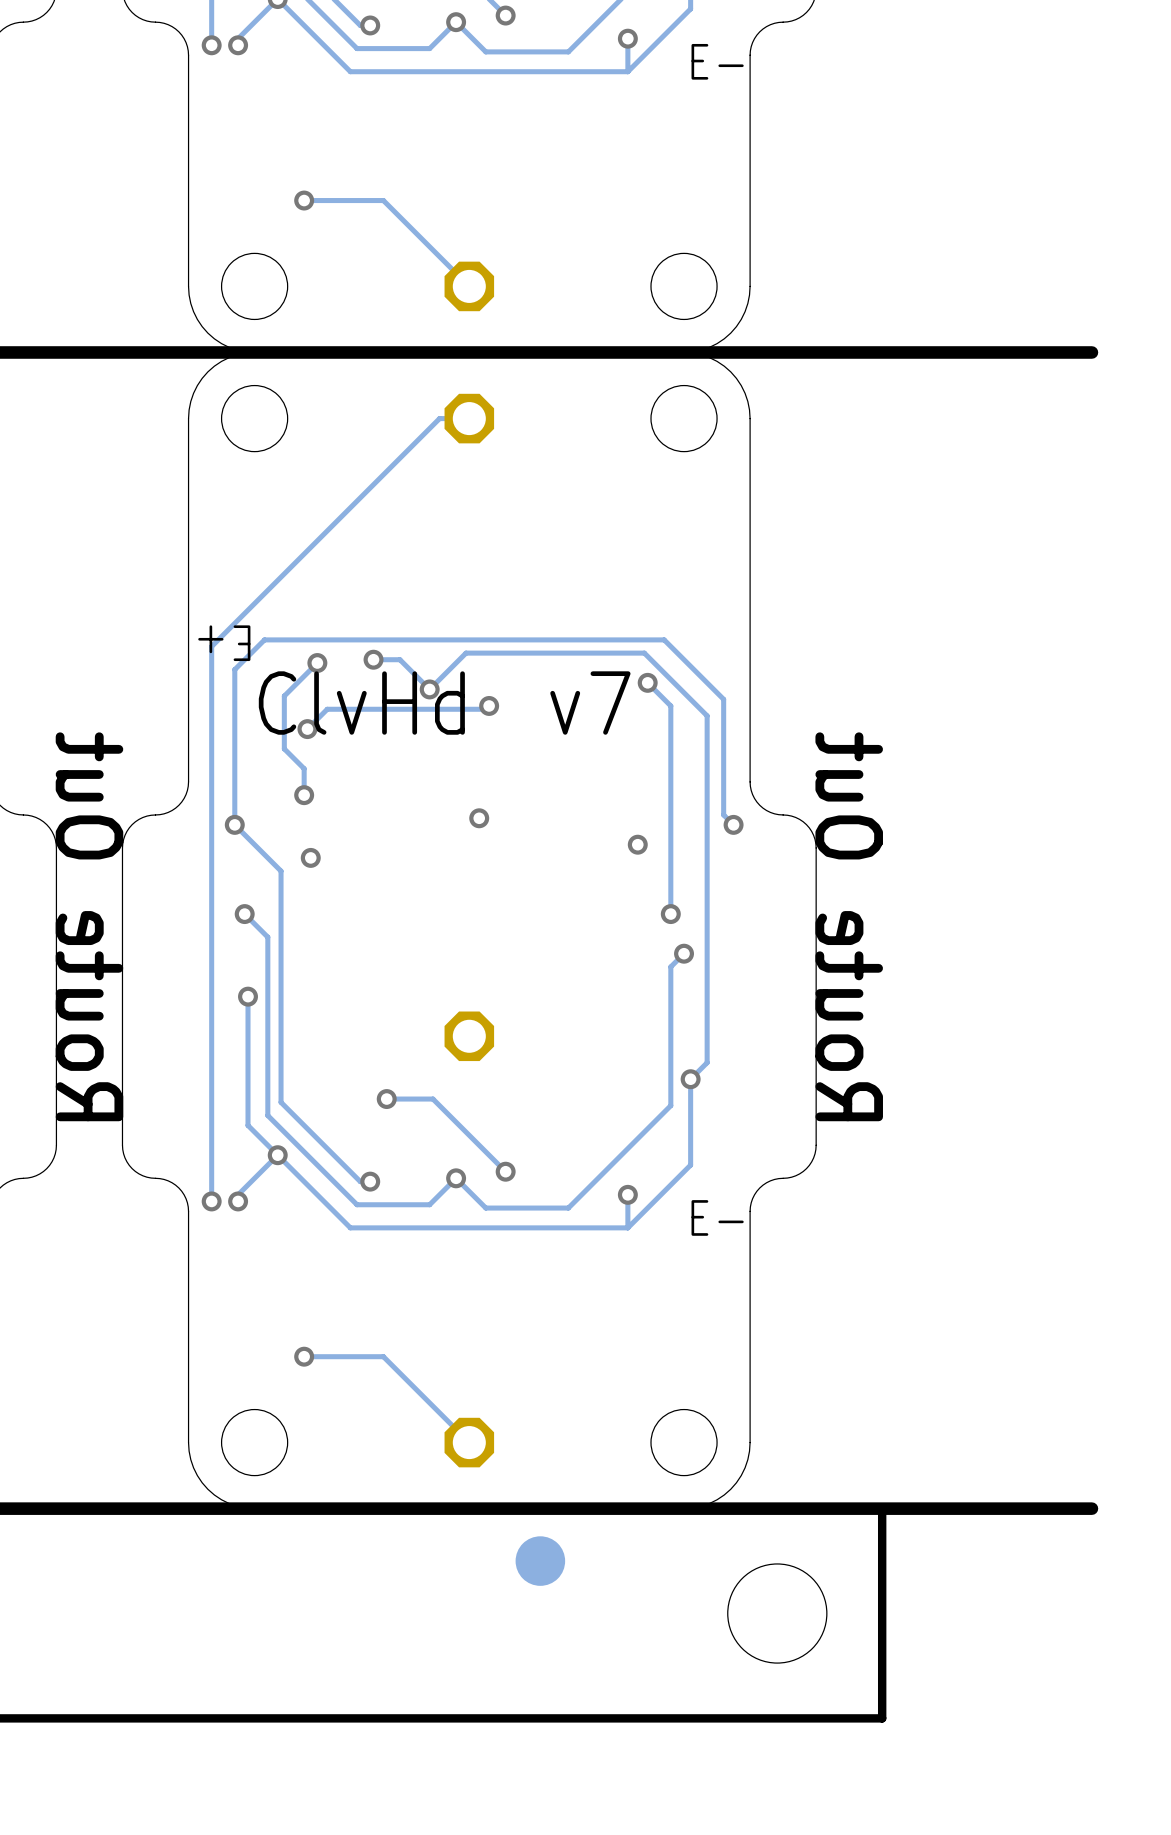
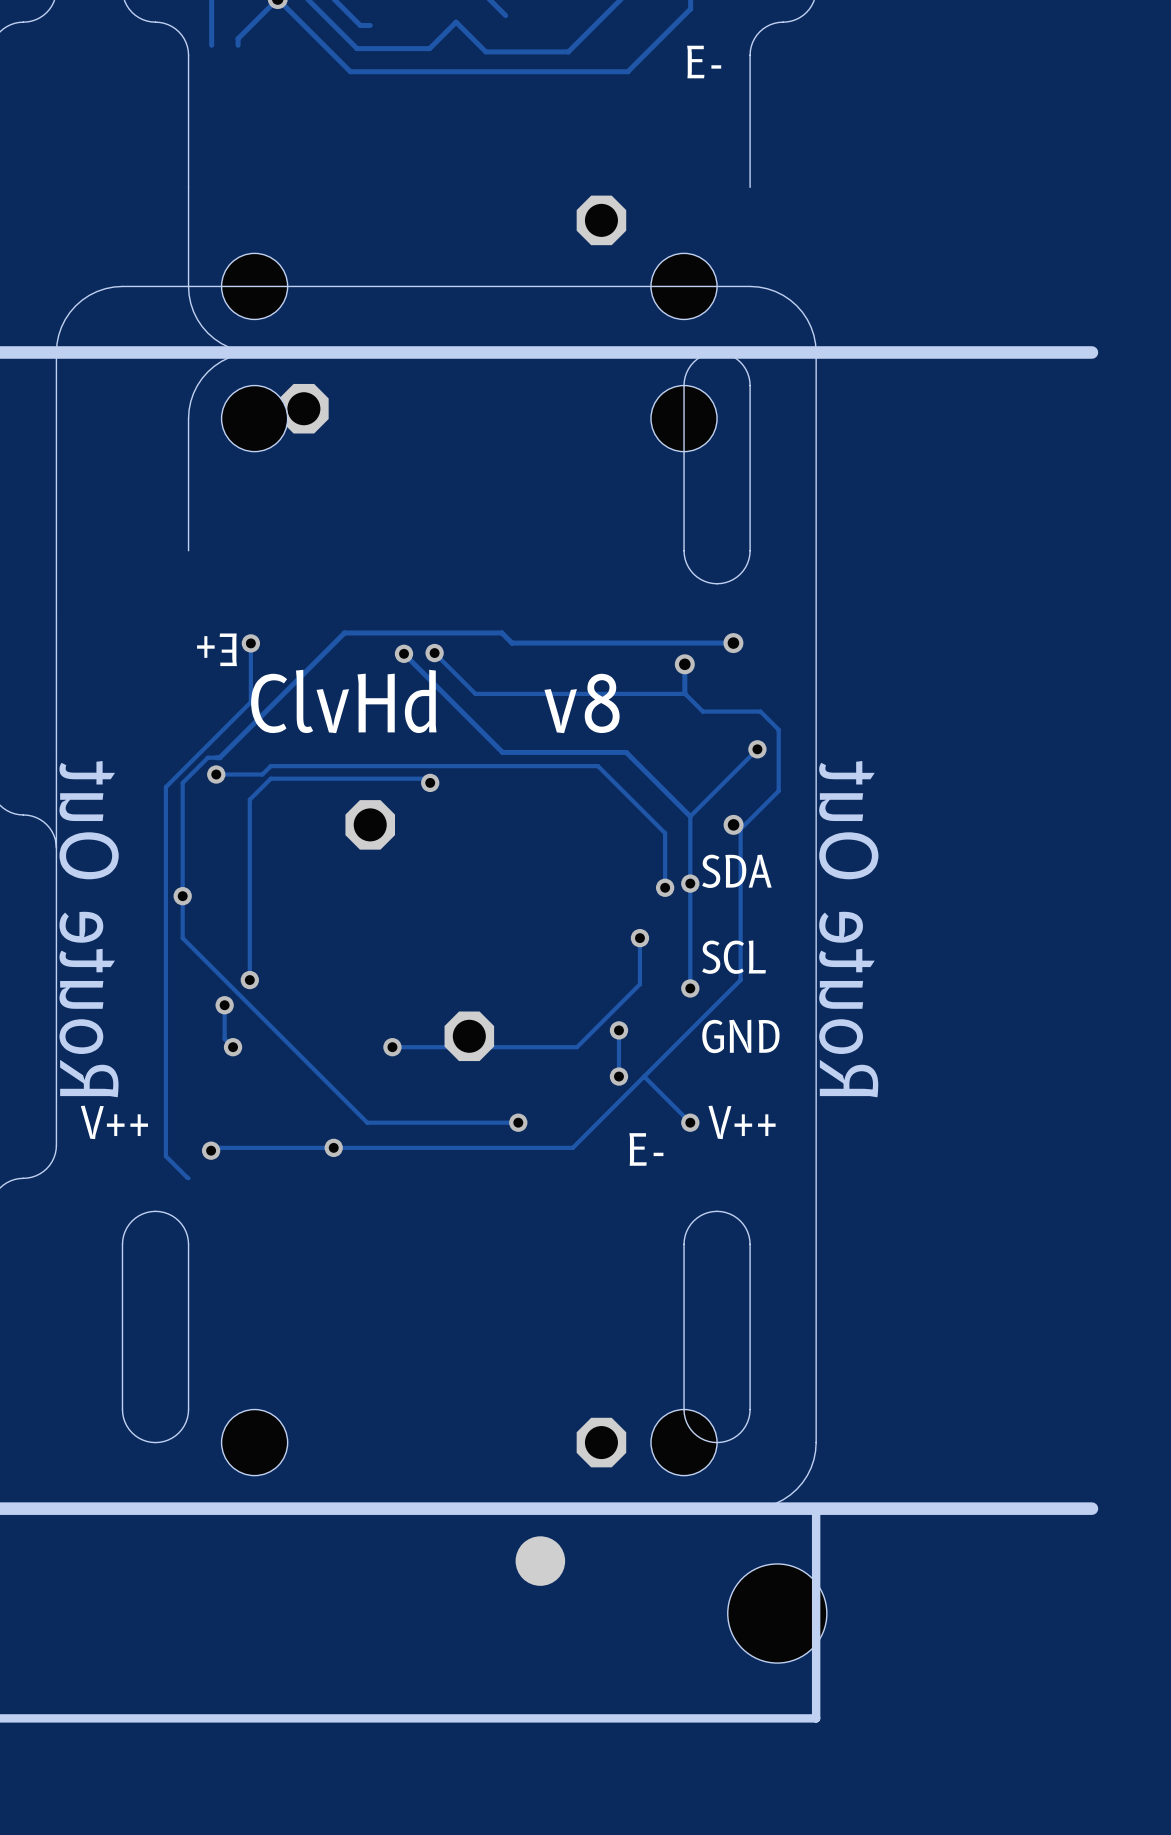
via: (505, 15) -> none
via: (456, 22) -> none
via: (370, 25) -> none
track: (627, 38) (627, 71) -> none
via: (627, 38) -> none
via: (211, 45) -> none
via: (238, 45) -> none
board edge: (750, 187) (750, 286) (745, 311) (730, 333) (717, 343) (701, 350) (684, 352) (709, 357) (730, 371) (745, 393) (750, 418) -> (750, 550) (747, 563) (743, 570) (733, 579) (721, 583) (708, 582) (696, 576) (690, 570) (685, 559) (684, 385) (686, 372) (693, 362) (704, 355) (717, 352) (729, 355) (740, 362) (747, 372) (749, 381) (750, 418)
track: (304, 200) (383, 200) (469, 286) -> none
via: (304, 200) -> none
part: none -> (601, 220)
part: (469, 286) -> none
part: none -> (303, 408)
track: (469, 418) (439, 418) (211, 646) (211, 1201) -> none
part: (469, 418) -> none
board edge: (188, 550) (187, 790) (181, 802) (172, 810) (142, 817) (132, 824) (124, 835) (122, 848) (122, 1149) (126, 1161) (135, 1171) (146, 1177) (168, 1180) (181, 1191) (188, 1207) (188, 1244) -> none
board edge: (750, 550) (751, 790) (756, 802) (766, 810) (795, 817) (806, 824) (813, 835) (816, 848) -> (56, 848) (56, 343) (65, 319) (75, 305) (97, 291) (122, 286) (750, 286) (775, 291) (790, 300) (802, 312) (811, 327) (816, 352) (816, 848)
text position: E+ (224, 643) -> E+ (217, 649)
track: none -> (250, 643) (250, 702) (165, 787) (165, 1156) (188, 1178)
via: none -> (250, 643)
track: none -> (733, 643) (512, 643) (501, 632) (344, 632) (219, 757) (207, 757) (182, 782) (182, 938) (367, 1122) (518, 1122)
via: none -> (733, 643)
track: none -> (404, 653) (502, 752) (626, 752) (690, 816)
via: none -> (404, 653)
track: none -> (434, 653) (475, 693) (685, 693) (702, 711) (760, 711) (778, 729) (778, 790) (740, 829) (740, 980) (572, 1147) (213, 1147) (211, 1150)
via: none -> (434, 653)
track: (373, 659) (399, 659) (429, 689) (466, 653) (644, 653) (684, 693) -> (684, 664) (684, 693)
via: (373, 659) -> none
track: (317, 663) (284, 696) (284, 748) (304, 768) (304, 795) -> none
via: (317, 663) -> none
track: (647, 682) (670, 705) (670, 914) -> none
via position: (647, 682) -> (684, 664)
via: (429, 689) -> none
track: (685, 693) (707, 715) (707, 1062) (690, 1079) (690, 1165) (627, 1227) -> none
text: v7 (590, 703) -> v8 (582, 703)
track: (489, 705) (485, 709) (327, 709) (307, 729) -> none
via: (489, 705) -> none
via: (307, 729) -> none
track: none -> (757, 749) (690, 816)
via: none -> (757, 749)
track: none -> (216, 774) (262, 774) (270, 766) (598, 766) (665, 833) (665, 887)
via: none -> (216, 774)
track: none -> (430, 782) (426, 778) (270, 778) (249, 799) (249, 980)
via: none -> (430, 782)
via: (304, 795) -> none
track: none -> (690, 816) (690, 988)
via: (479, 818) -> none
via: (234, 824) -> none
part: none -> (370, 824)
track: (733, 824) (723, 814) (723, 699) (664, 639) (264, 639) (234, 669) (234, 824) (281, 871) (281, 1102) (360, 1181) (370, 1181) -> none
via: (637, 844) -> none
via: (310, 857) -> none
text: none -> SDA (736, 871)
via: none -> (690, 883)
via: none -> (665, 887)
via: none -> (182, 896)
track: (244, 914) (267, 937) (267, 1115) (357, 1204) (429, 1204) (456, 1178) (485, 1208) (568, 1208) (670, 1105) (670, 966) (684, 953) -> none
via: (244, 914) -> none
via: (670, 914) -> none
track: none -> (639, 938) (639, 984) (577, 1047) (392, 1047)
via: none -> (639, 938)
via: (684, 953) -> none
text: none -> SCL (734, 957)
via: none -> (690, 988)
track: (248, 996) (248, 1125) (350, 1227) (627, 1227) -> none
via position: (248, 996) -> (249, 980)
track: none -> (224, 1005) (224, 1038) (233, 1047)
via: none -> (224, 1005)
track: none -> (618, 1030) (618, 1076)
via: none -> (618, 1030)
text: none -> GND (740, 1036)
via: none -> (233, 1047)
via: none -> (392, 1047)
via: none -> (618, 1076)
track: none -> (644, 1076) (690, 1122)
via: (690, 1079) -> none
track: (386, 1099) (432, 1099) (505, 1171) -> none
via: (386, 1099) -> none
text: none -> V++ (114, 1122)
via: none -> (518, 1122)
via: none -> (690, 1122)
text: none -> V++ (742, 1122)
board edge: (816, 1145) (813, 1157) (803, 1171) (791, 1177) (770, 1180) (763, 1185) (754, 1194) (750, 1207) (750, 1244) -> (816, 1145) (816, 1442) (811, 1467) (802, 1482) (790, 1494) (767, 1506) (750, 1508) (684, 1508)
via: none -> (333, 1147)
via: none -> (211, 1150)
track: (277, 1155) (238, 1194) (238, 1201) -> none
via: (277, 1155) -> none
via: (505, 1171) -> none
via: (456, 1178) -> none
via: (370, 1181) -> none
track: (627, 1194) (627, 1227) -> none
via: (627, 1194) -> none
via: (211, 1201) -> none
via: (238, 1201) -> none
text position: E- (717, 1217) -> E- (646, 1149)
track: (304, 1356) (383, 1356) (469, 1442) -> none
via: (304, 1356) -> none
board edge: (188, 1409) (189, 1451) (197, 1475) (207, 1489) (221, 1499) (237, 1506) (254, 1508) -> (188, 1409) (186, 1422) (178, 1432) (168, 1440) (155, 1442) (142, 1440) (132, 1432) (124, 1422) (122, 1409) (122, 1244) (124, 1231) (132, 1221) (142, 1213) (155, 1211) (164, 1212) (175, 1218) (181, 1224) (186, 1231) (188, 1244)
board edge: (750, 1409) (749, 1451) (741, 1475) (730, 1489) (717, 1499) (701, 1506) (684, 1508) -> (750, 1409) (747, 1422) (740, 1432) (729, 1440) (717, 1442) (704, 1440) (693, 1432) (686, 1422) (684, 1409) (684, 1244) (686, 1231) (693, 1221) (704, 1213) (717, 1211) (725, 1212) (737, 1218) (743, 1224) (747, 1231) (750, 1244)
part position: (469, 1442) -> (601, 1442)
board edge: (816, 1508) (882, 1508) (882, 1718) (816, 1718) -> (816, 1508) (816, 1718)

